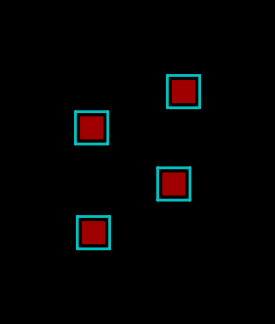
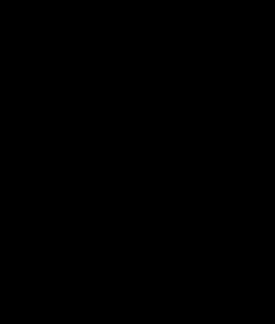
part: (183, 91) -> none
part: (91, 127) -> none
part: (173, 183) -> none
part: (93, 232) -> none

